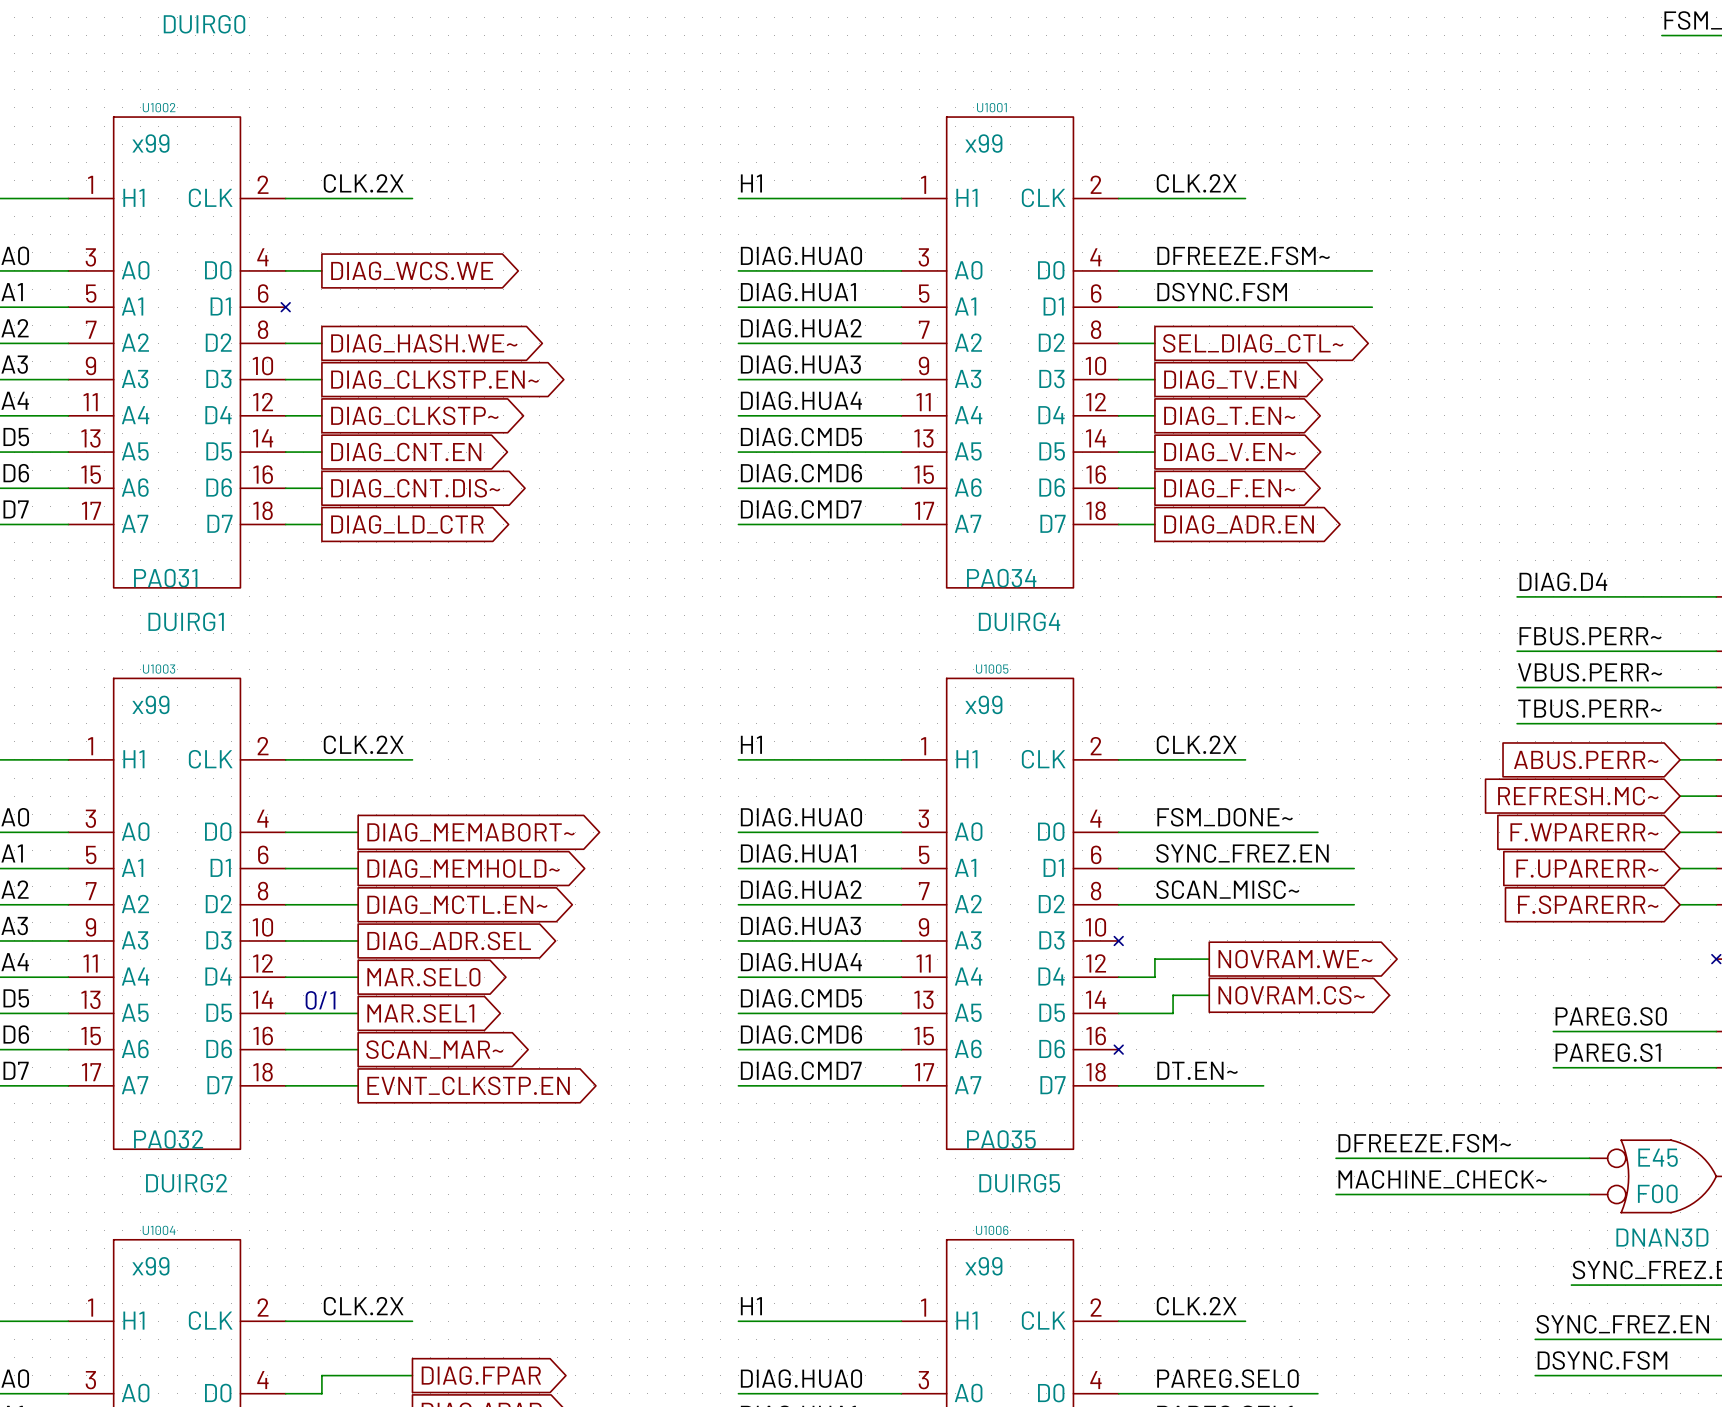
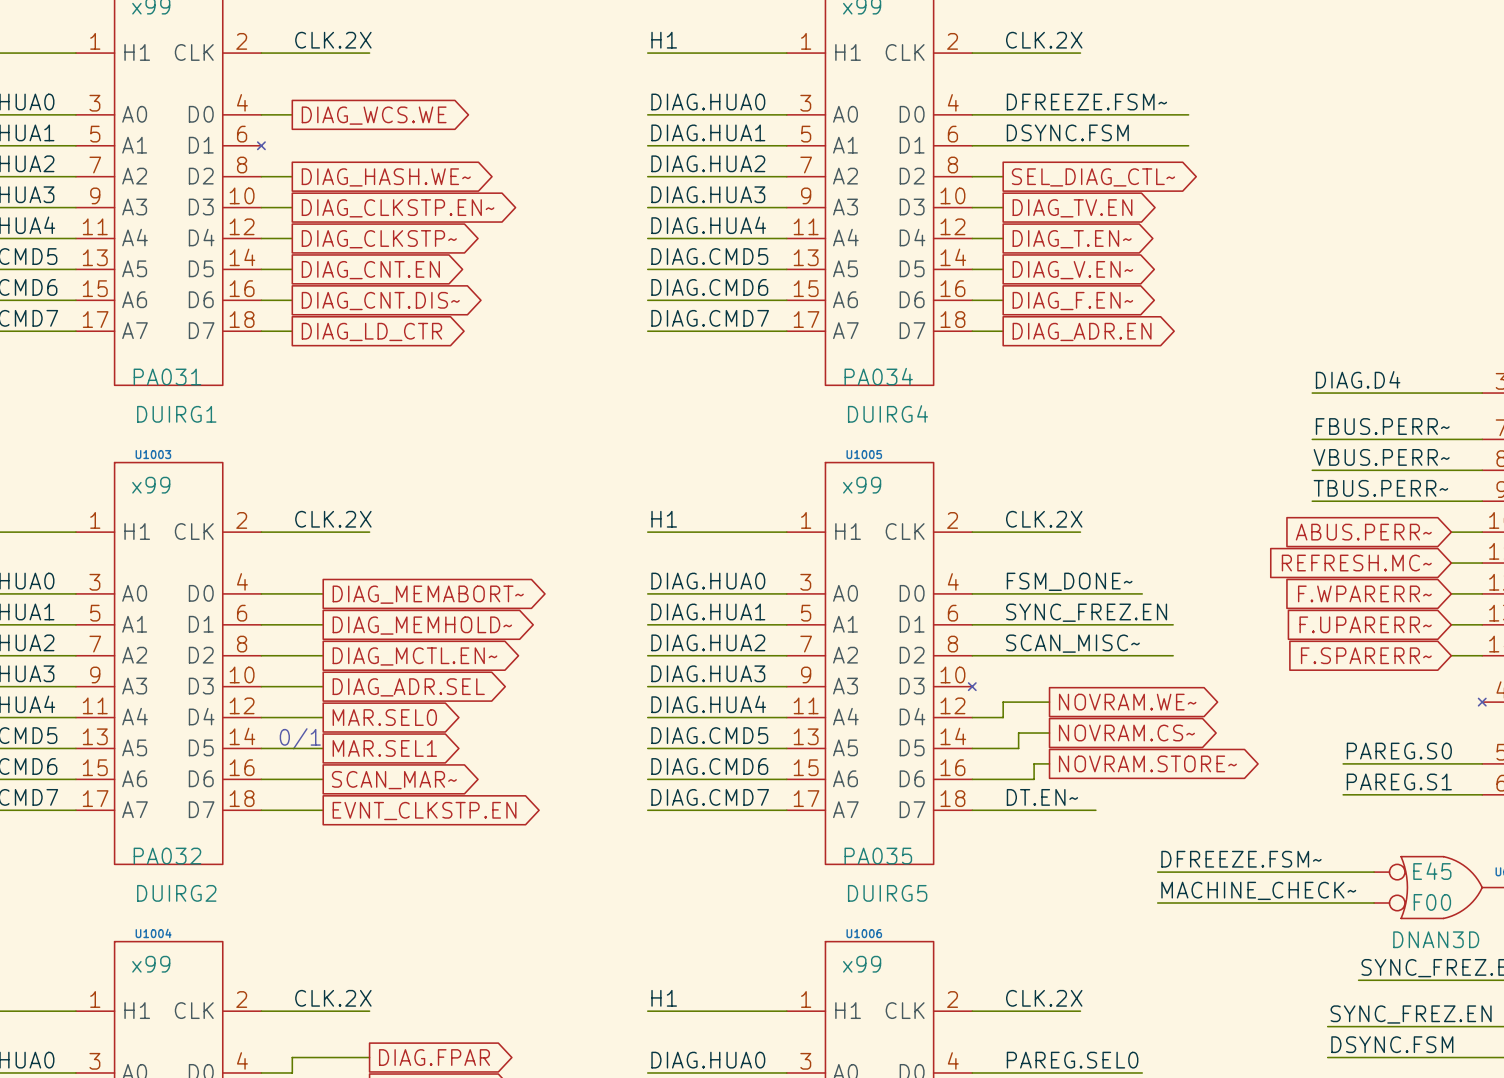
wire: none -> (1049, 763) (1034, 763) (1034, 779) (972, 779)
global label: none -> NOVRAM.STORE~ (1147, 763)
no-connect mark: (1118, 1049) -> none

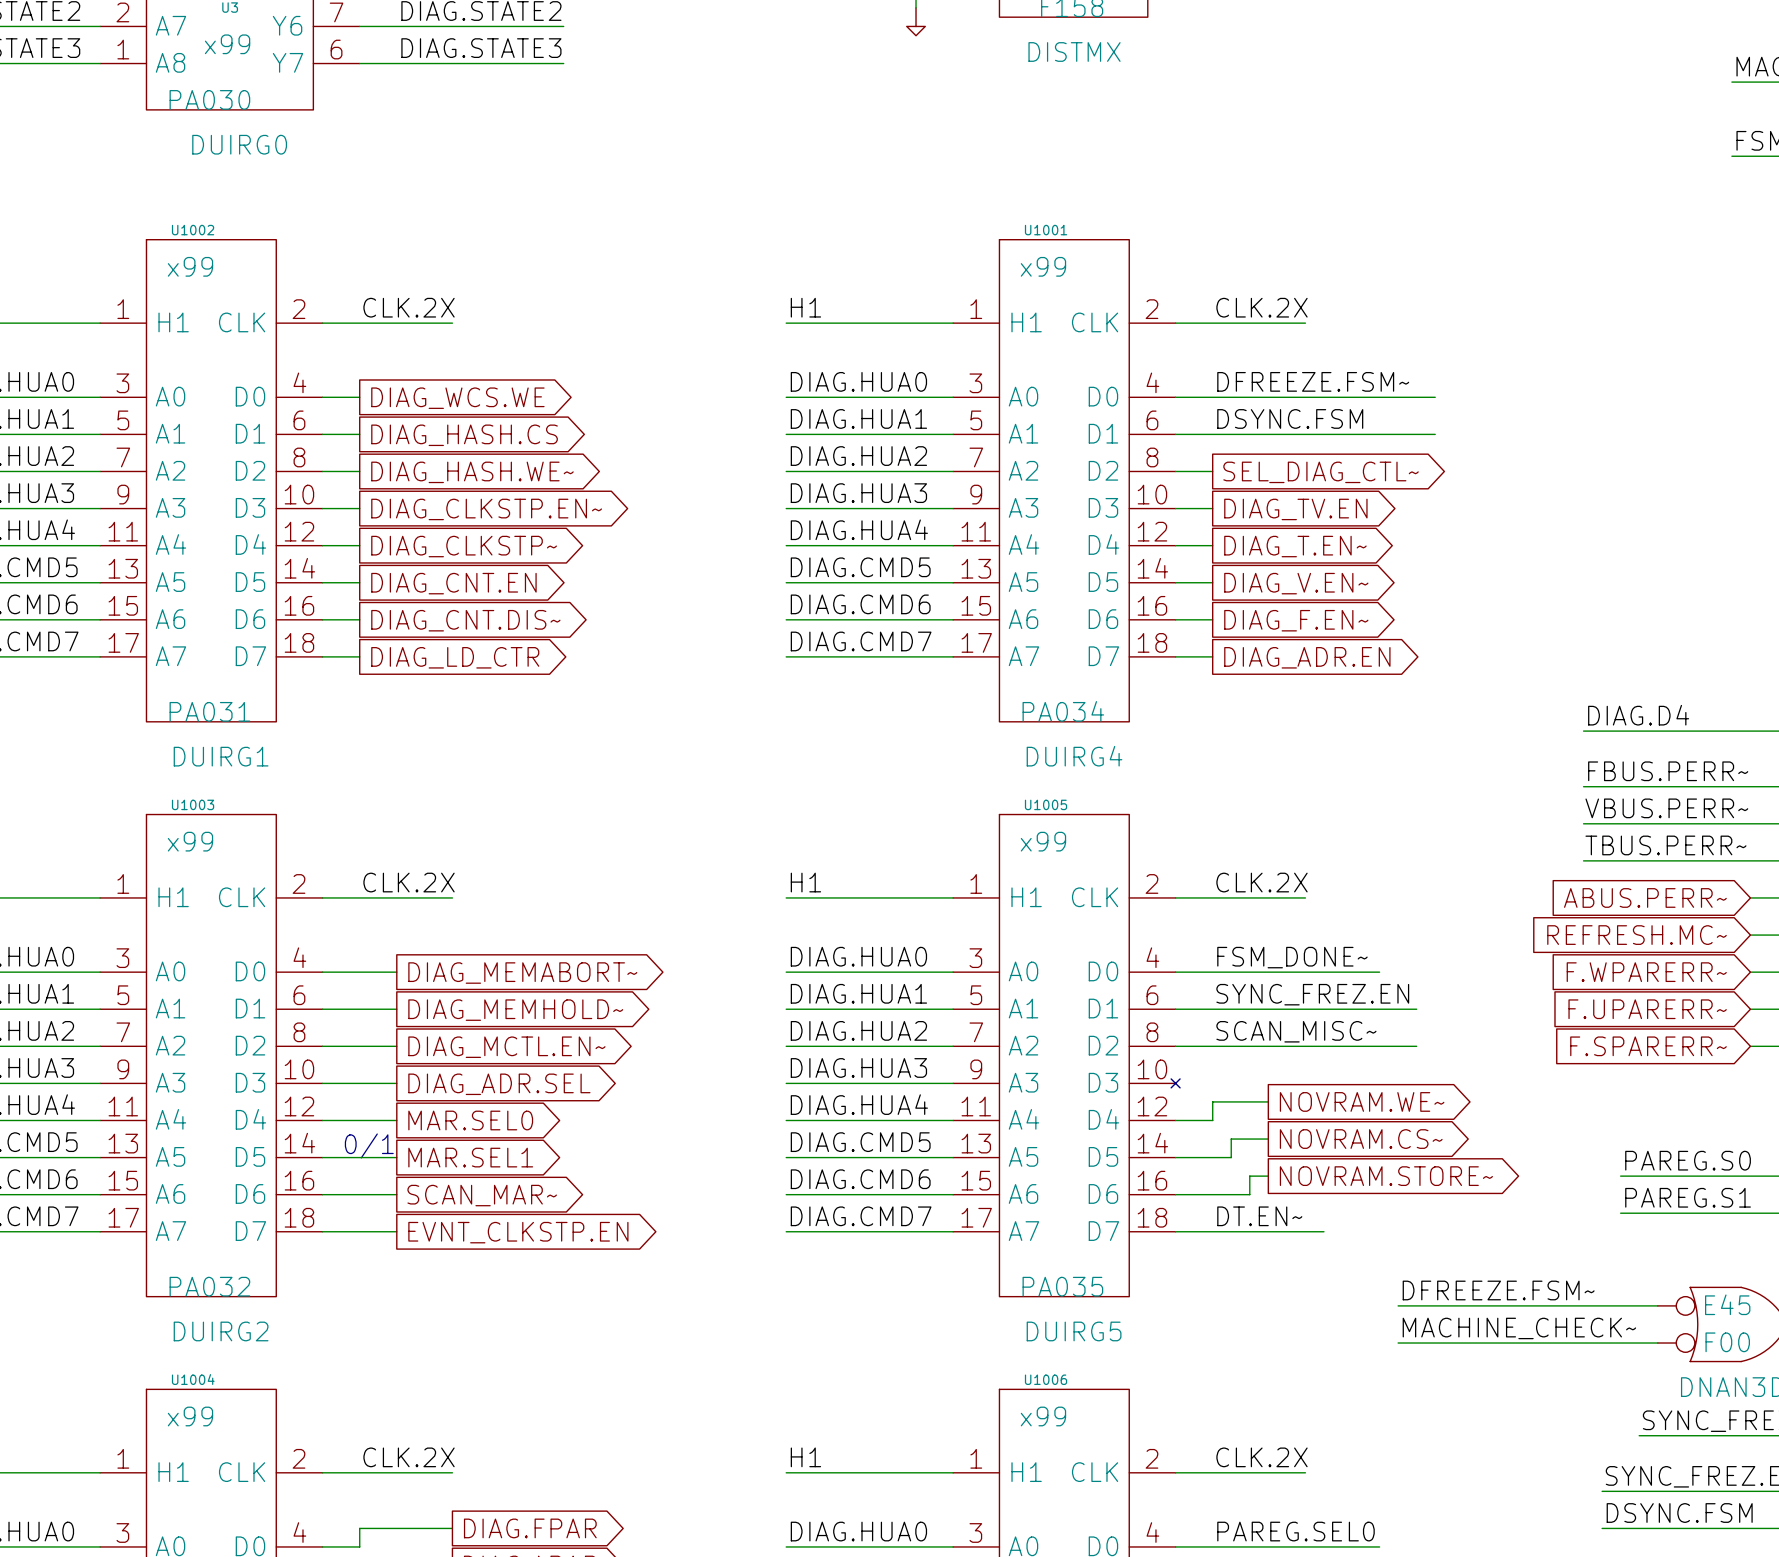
wire: none -> (322, 434) (359, 434)
no-connect mark: (261, 145) -> none
global label: none -> DIAG_HASH.CS (464, 435)

